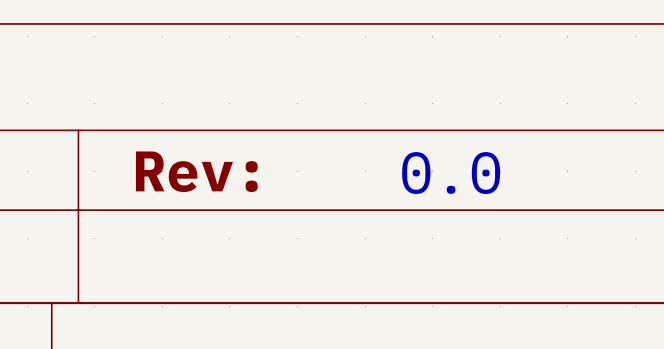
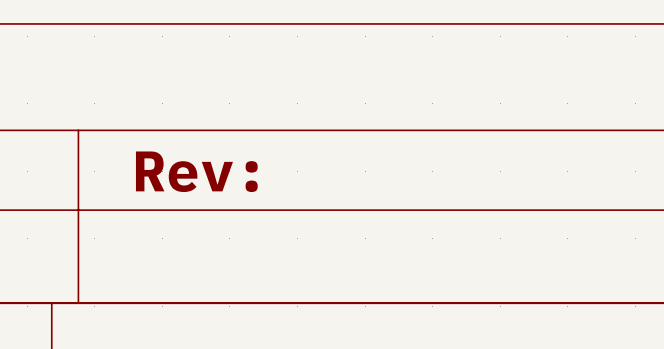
text: 0.0 (451, 173) -> none

